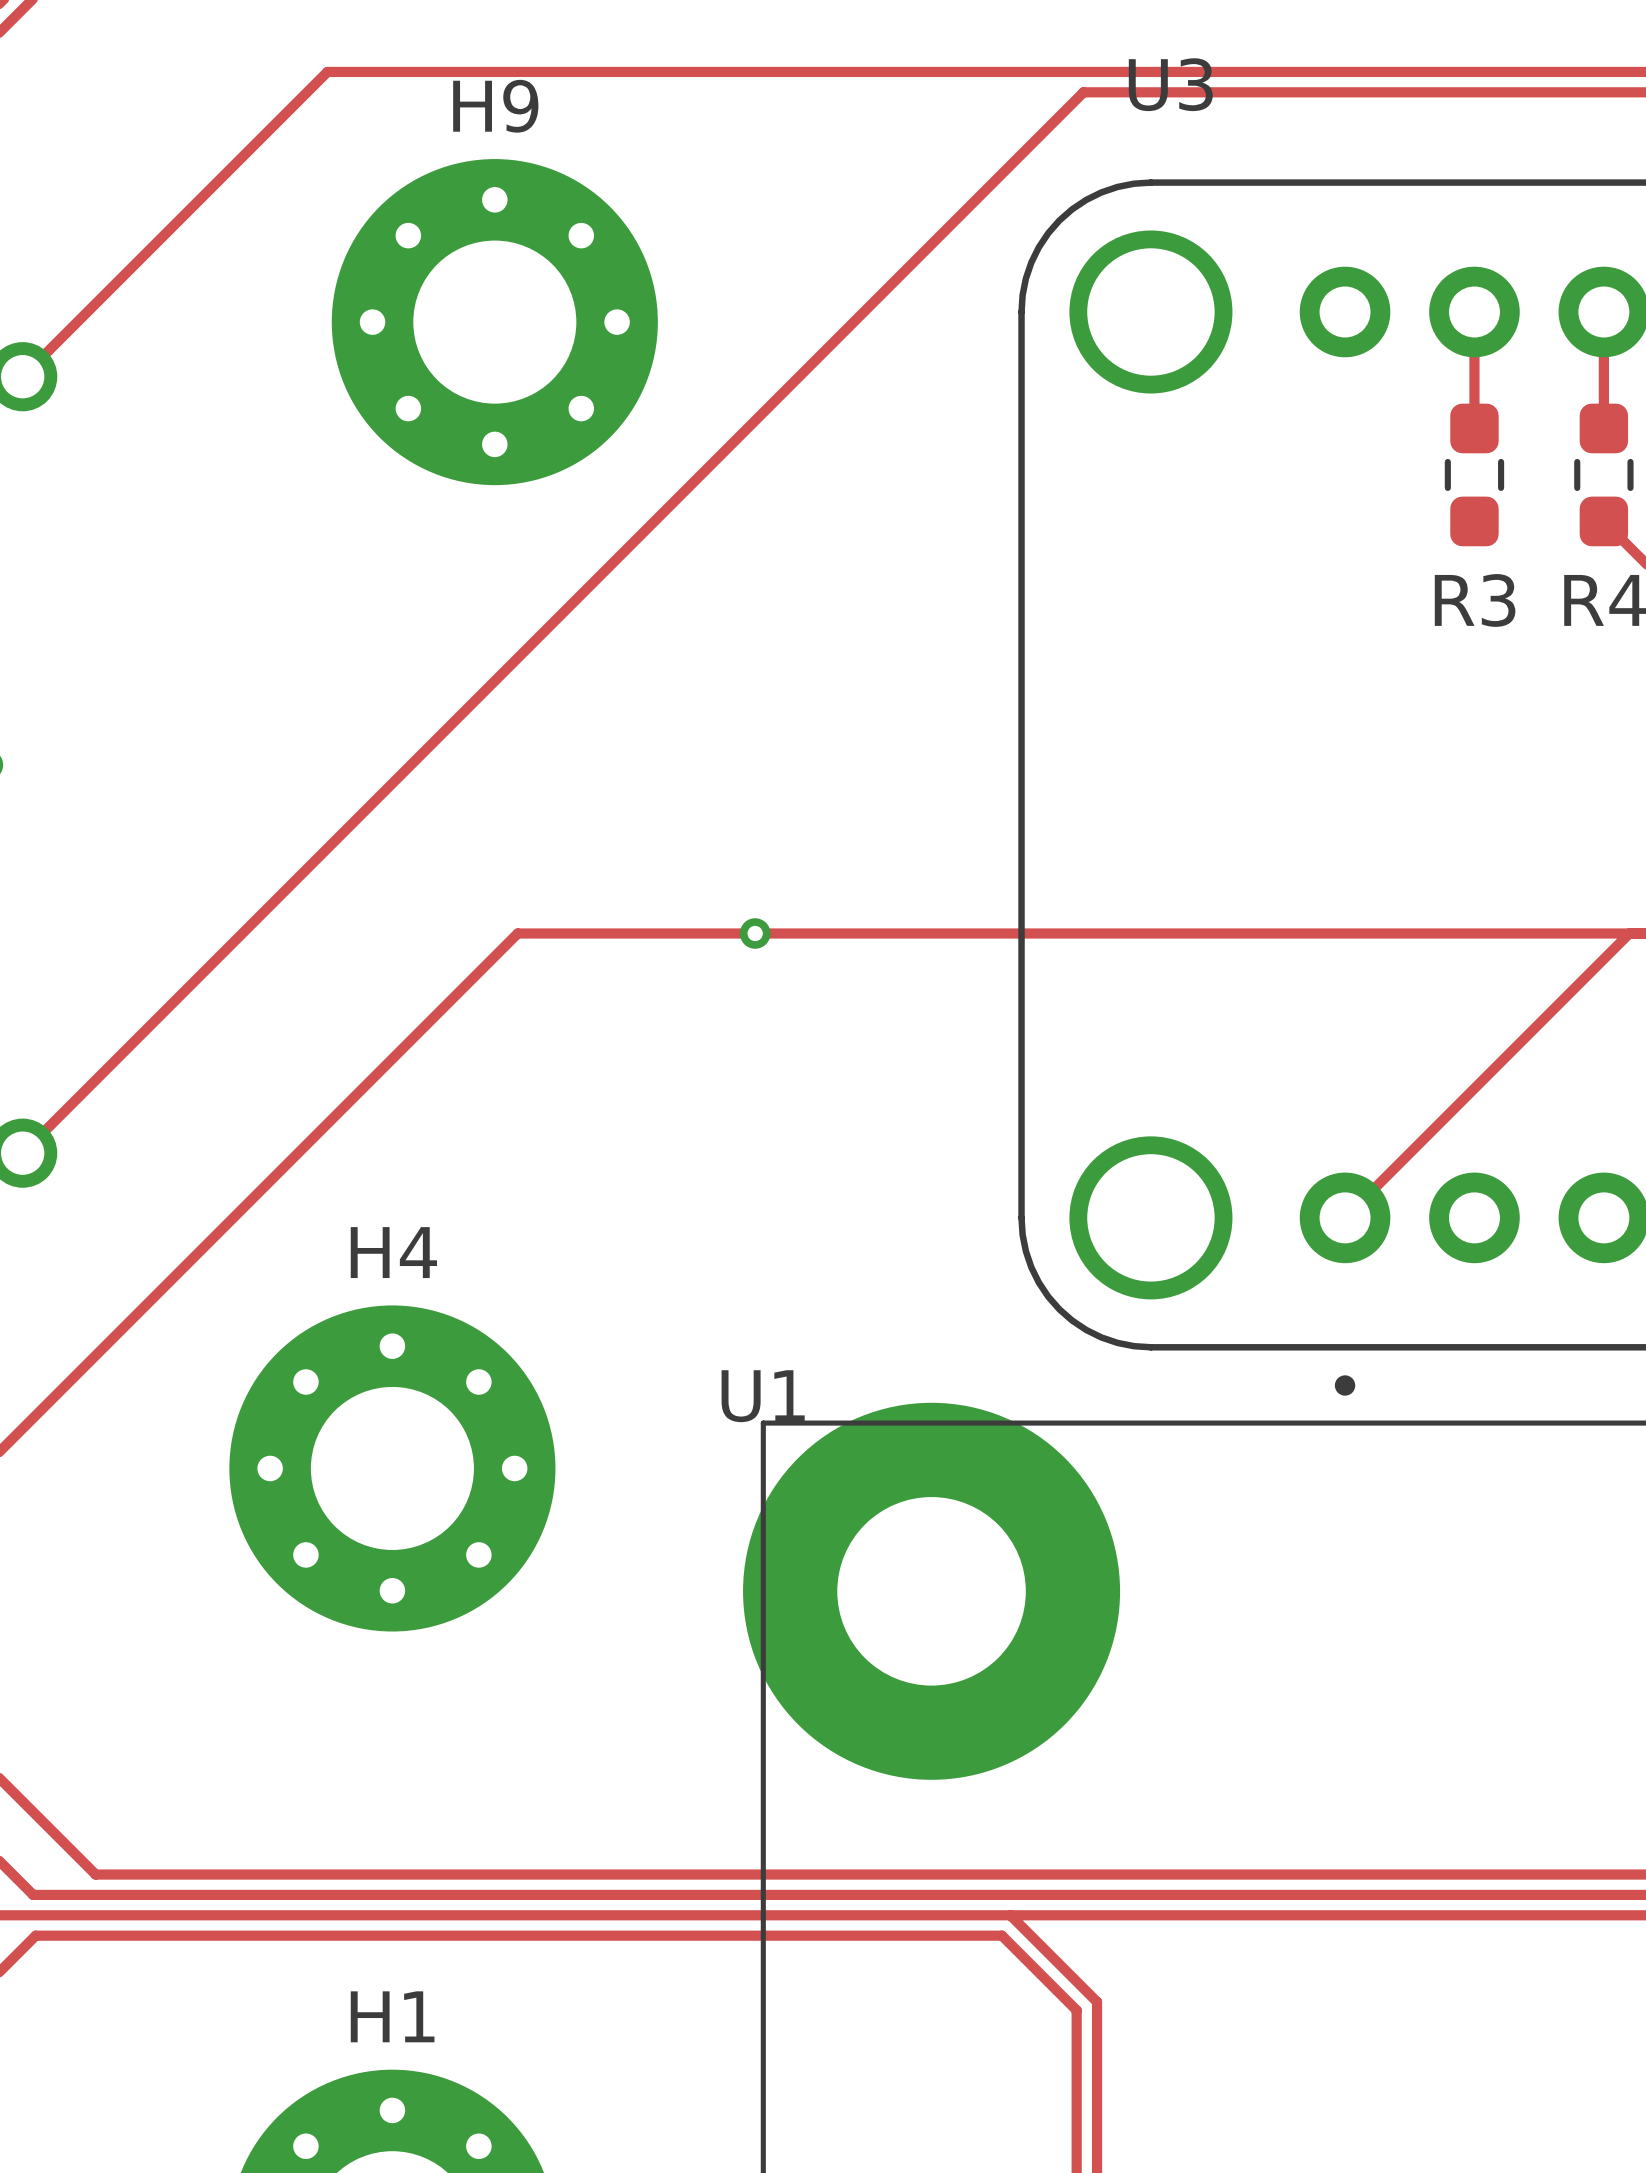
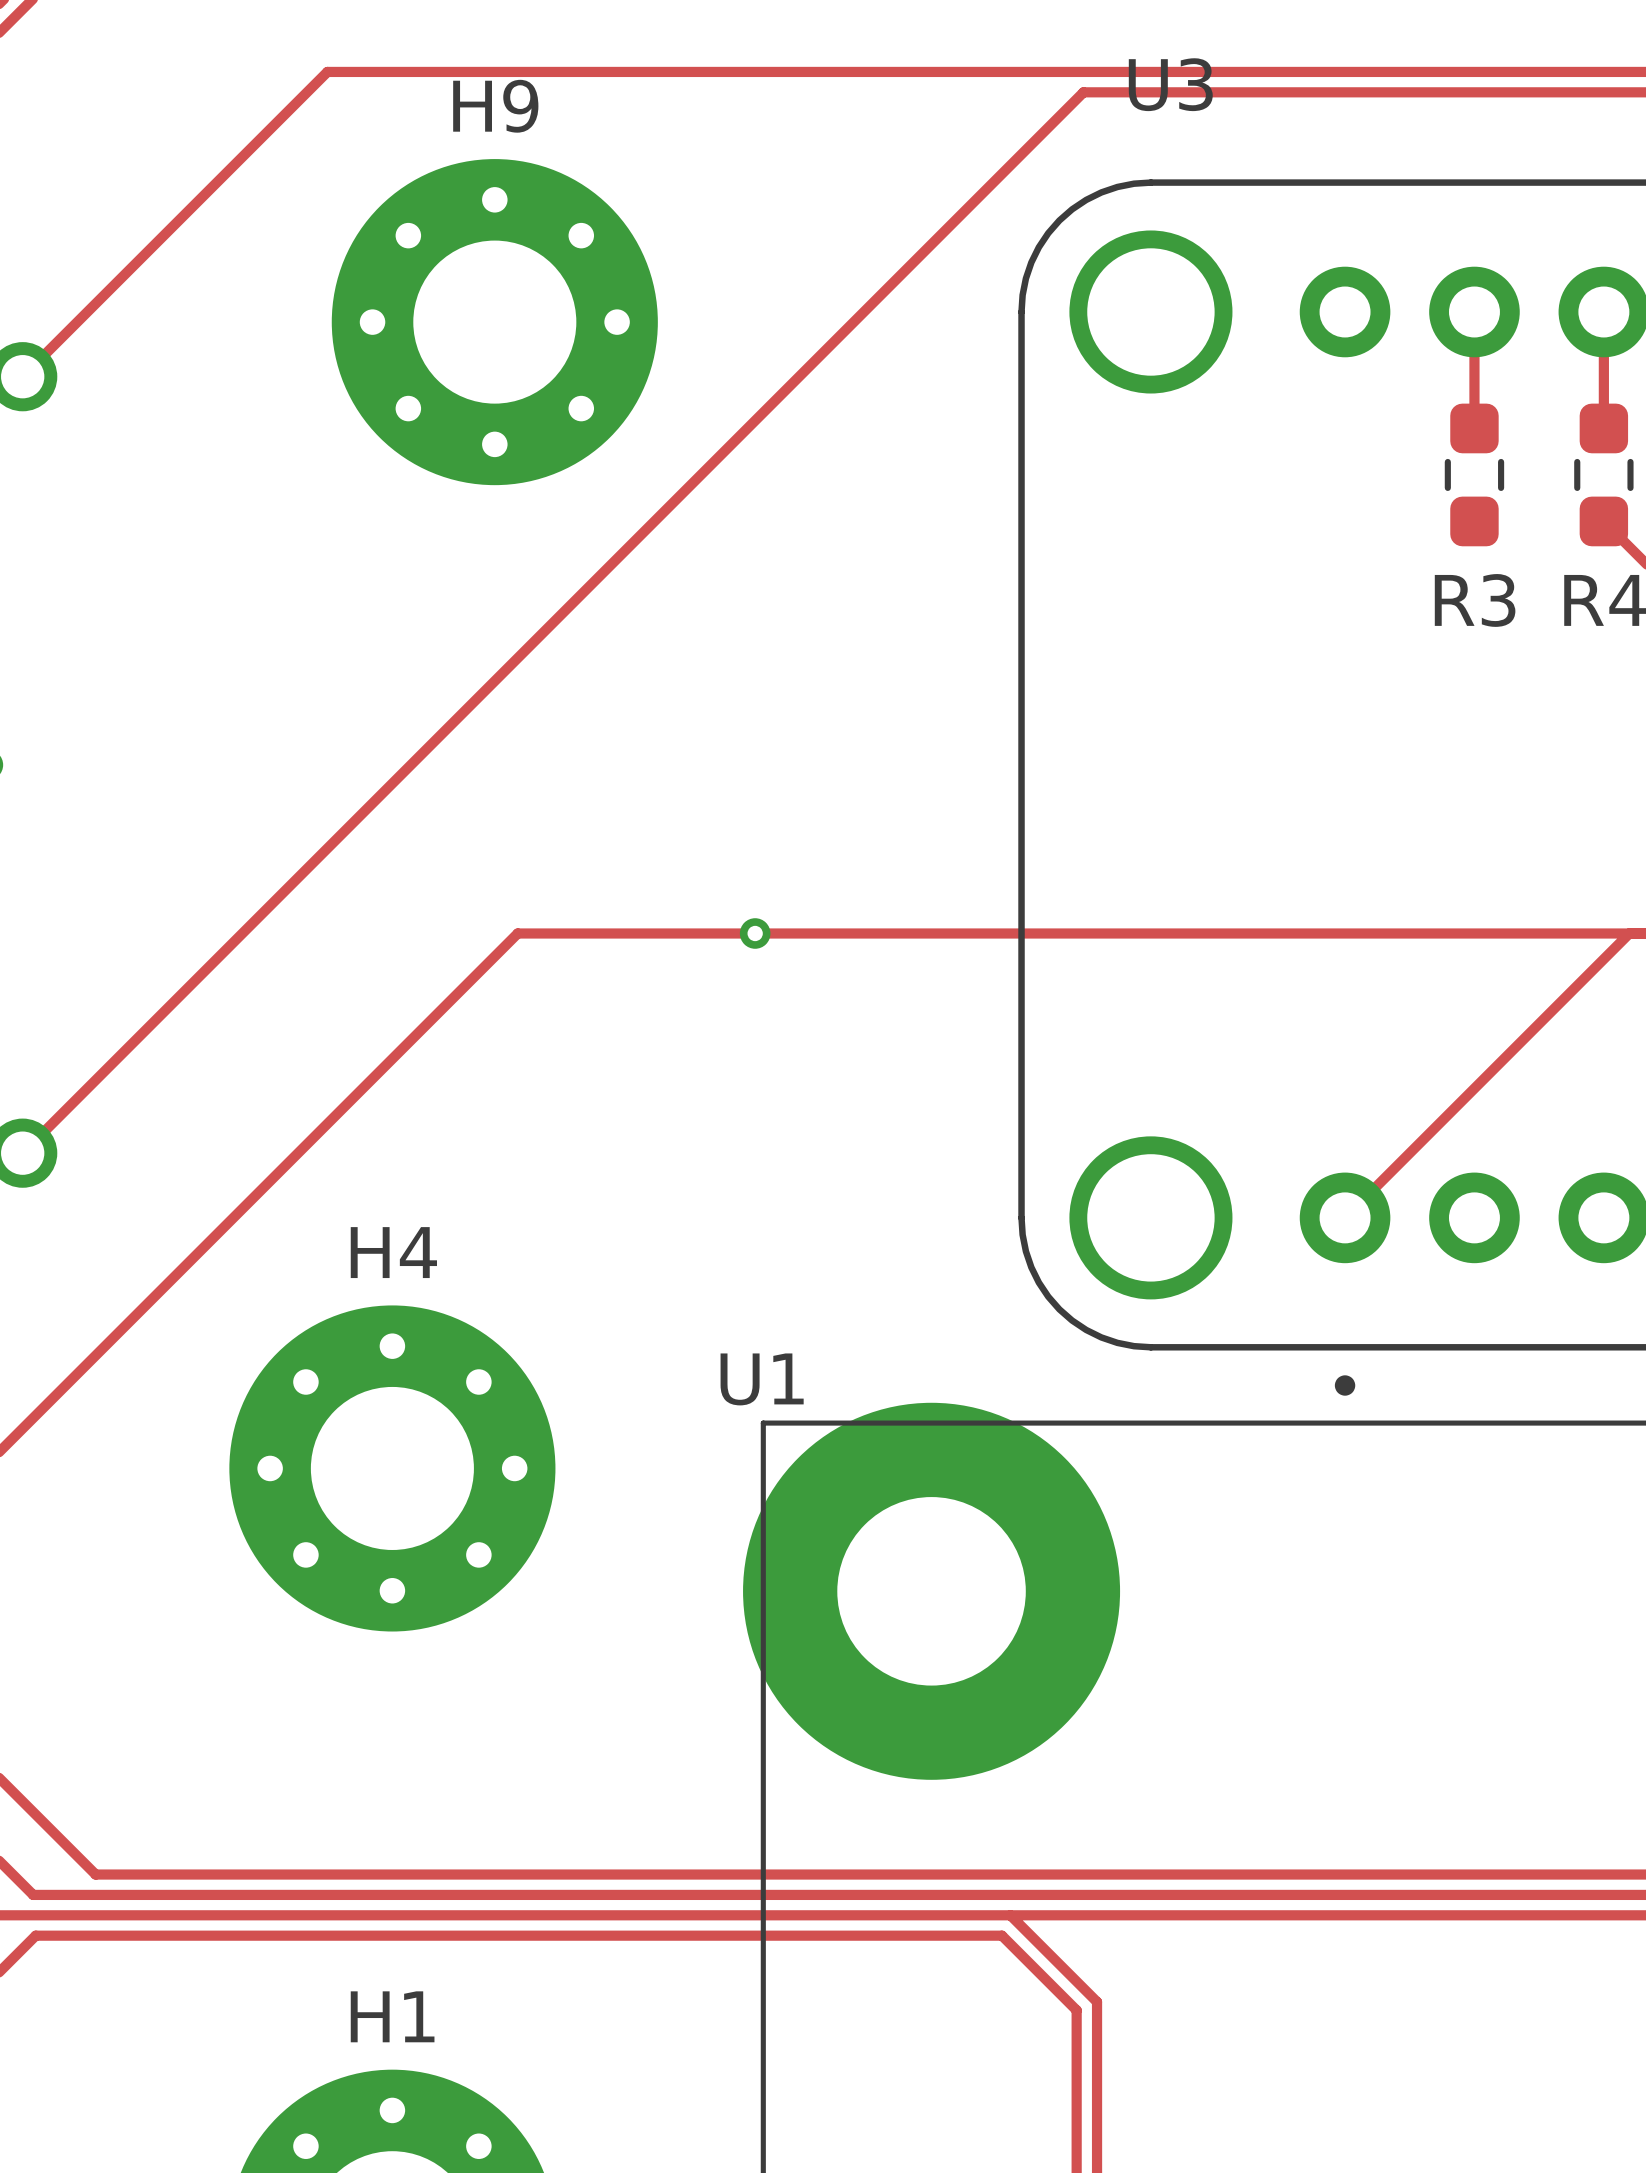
U1 name position: U1 (763, 1396) -> U1 (762, 1379)

